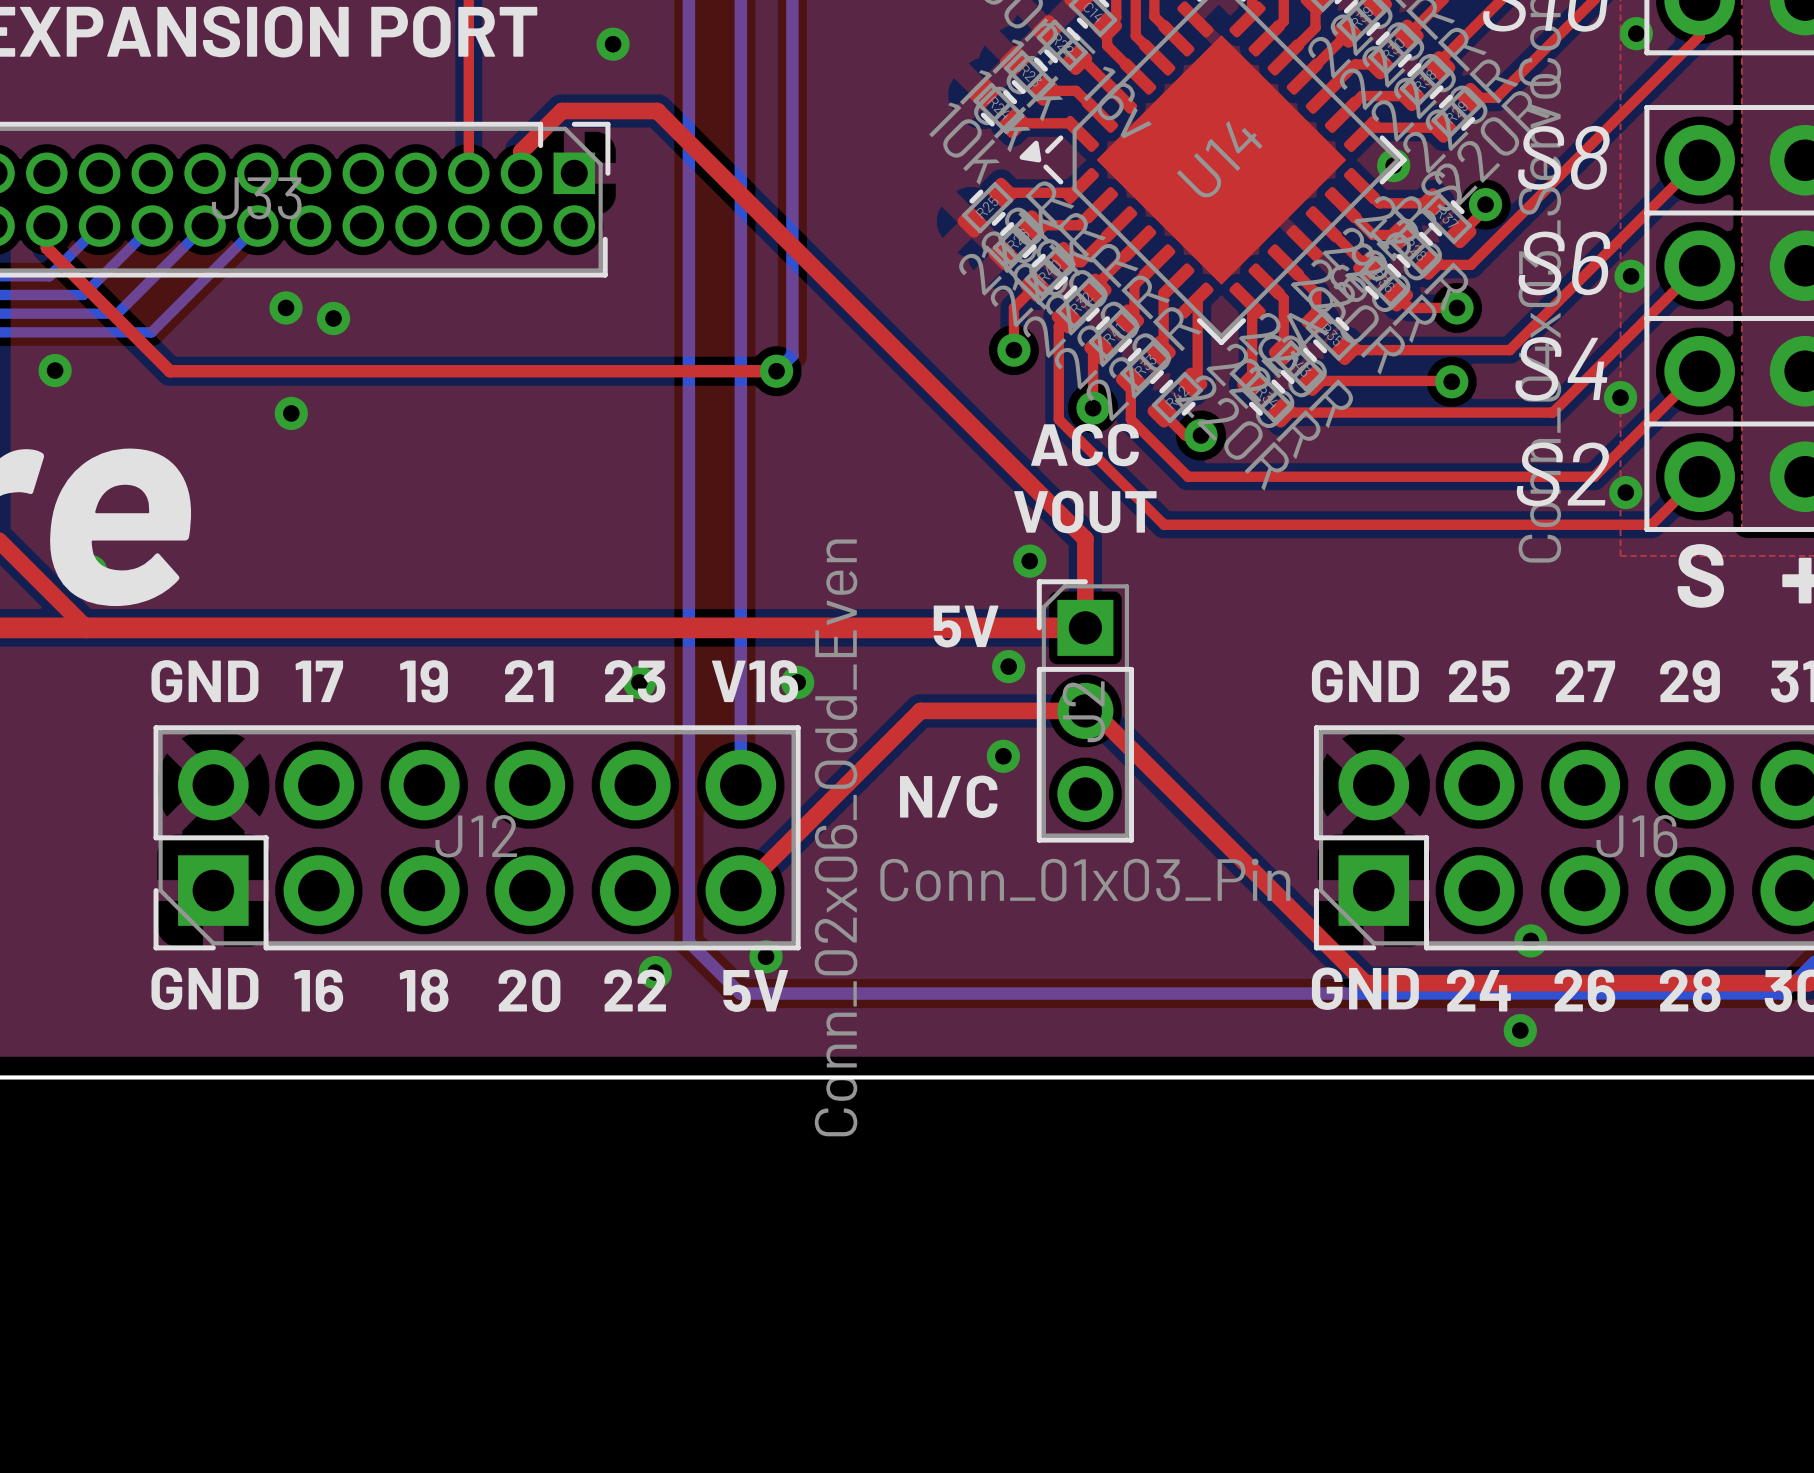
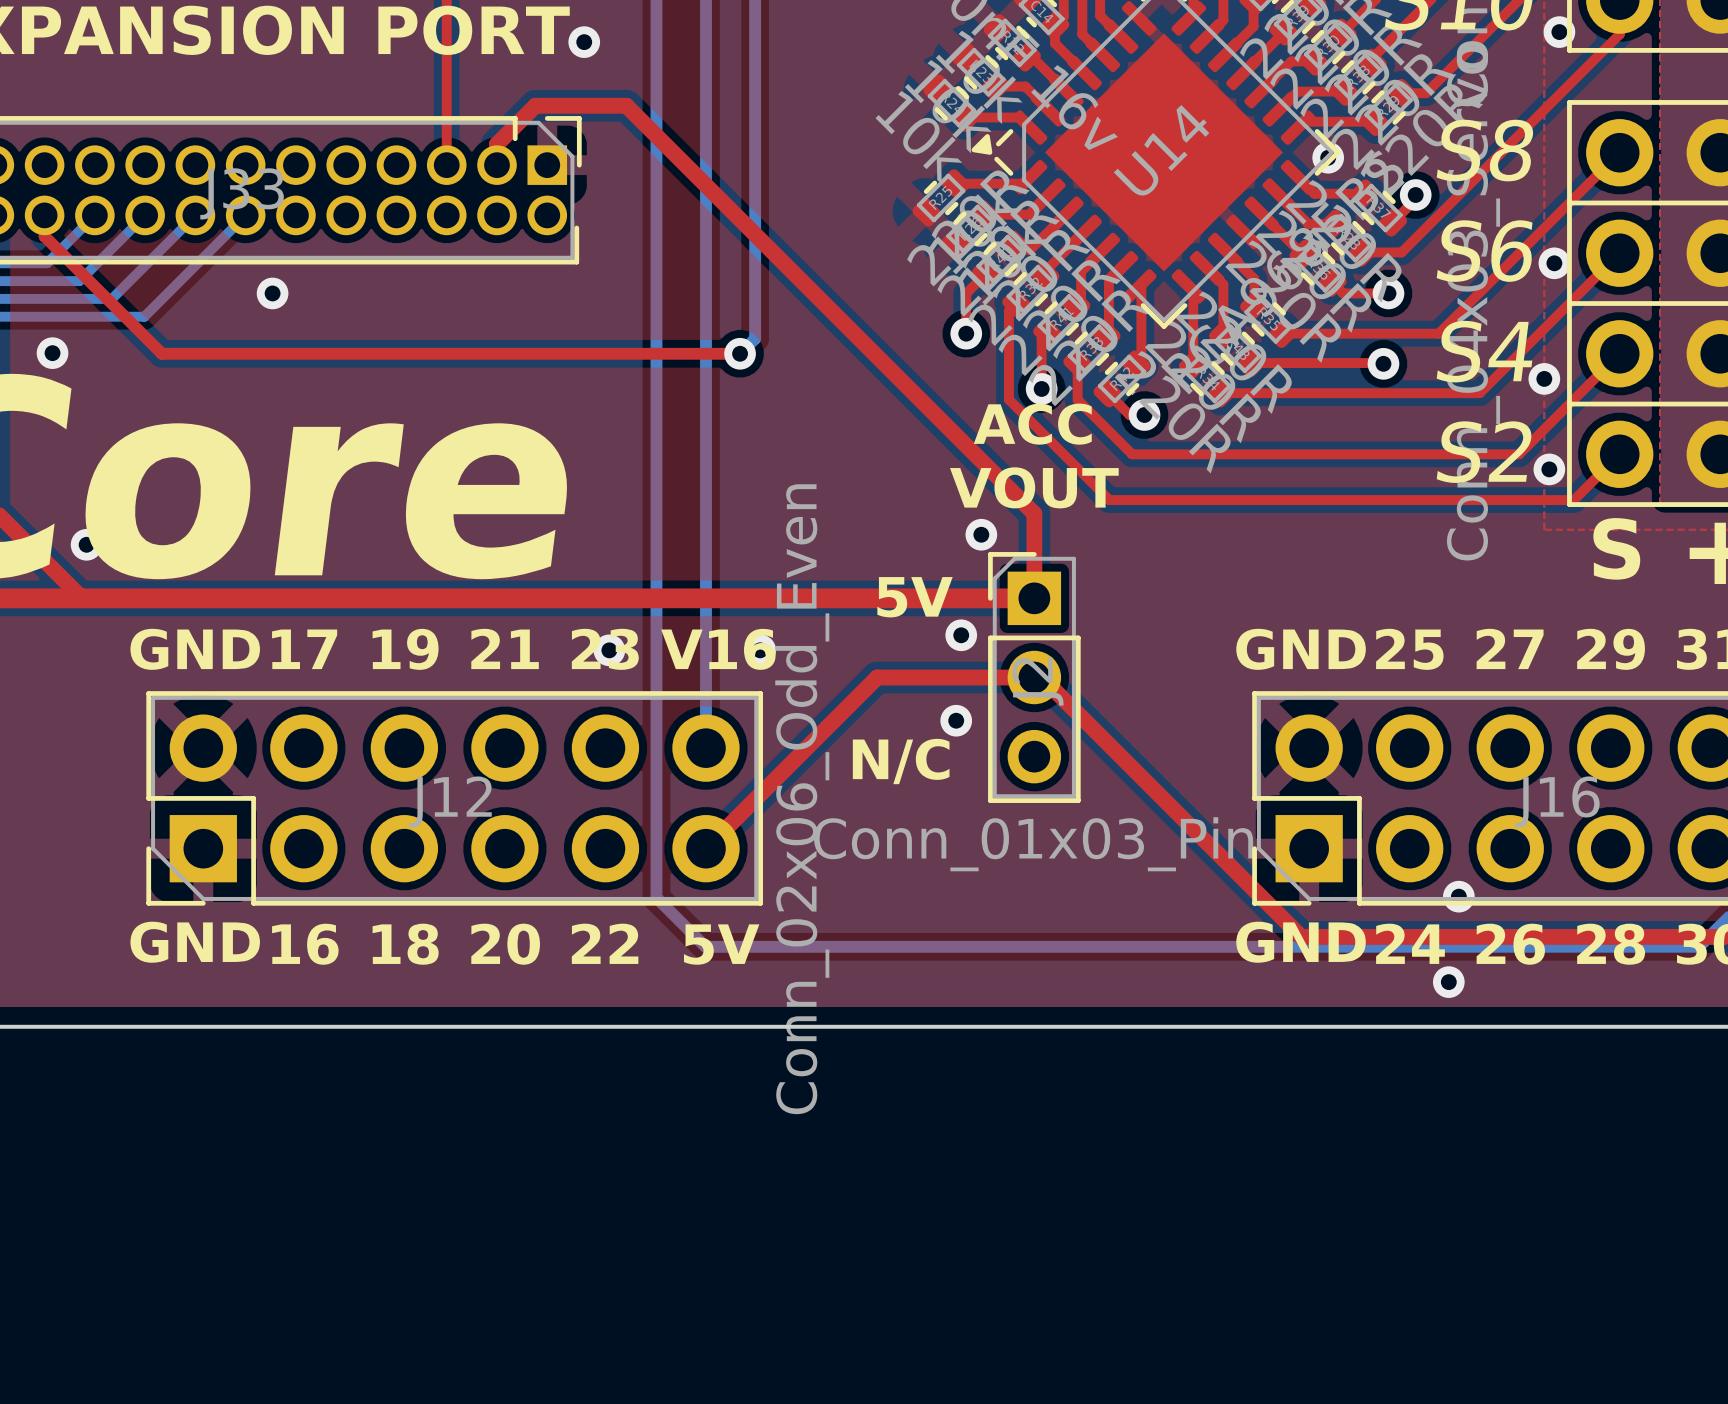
via: (333, 318) -> none
via: (291, 413) -> none
via: (766, 956) -> none
via: (655, 972) -> none

